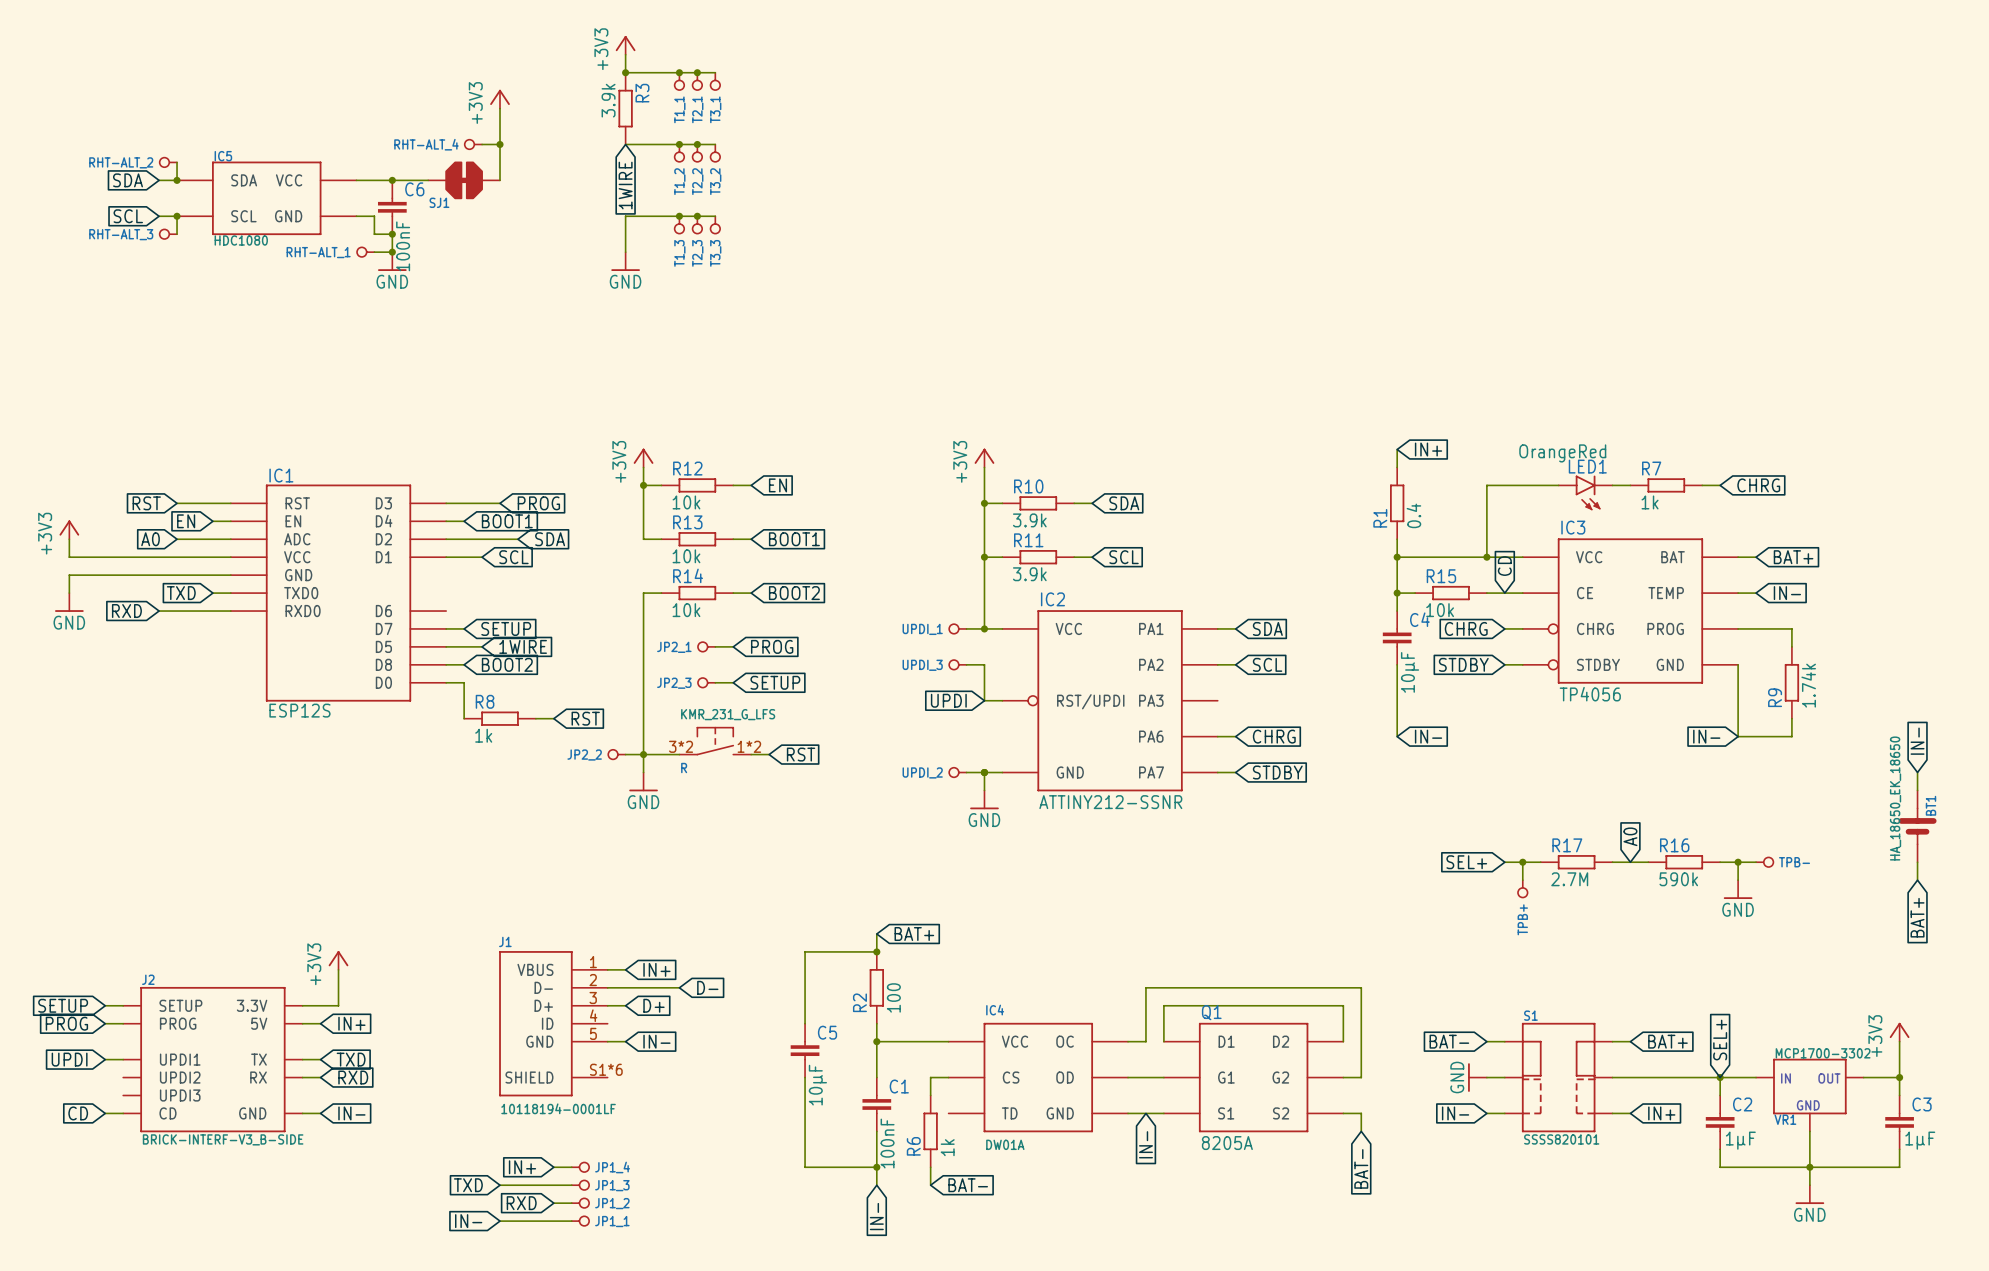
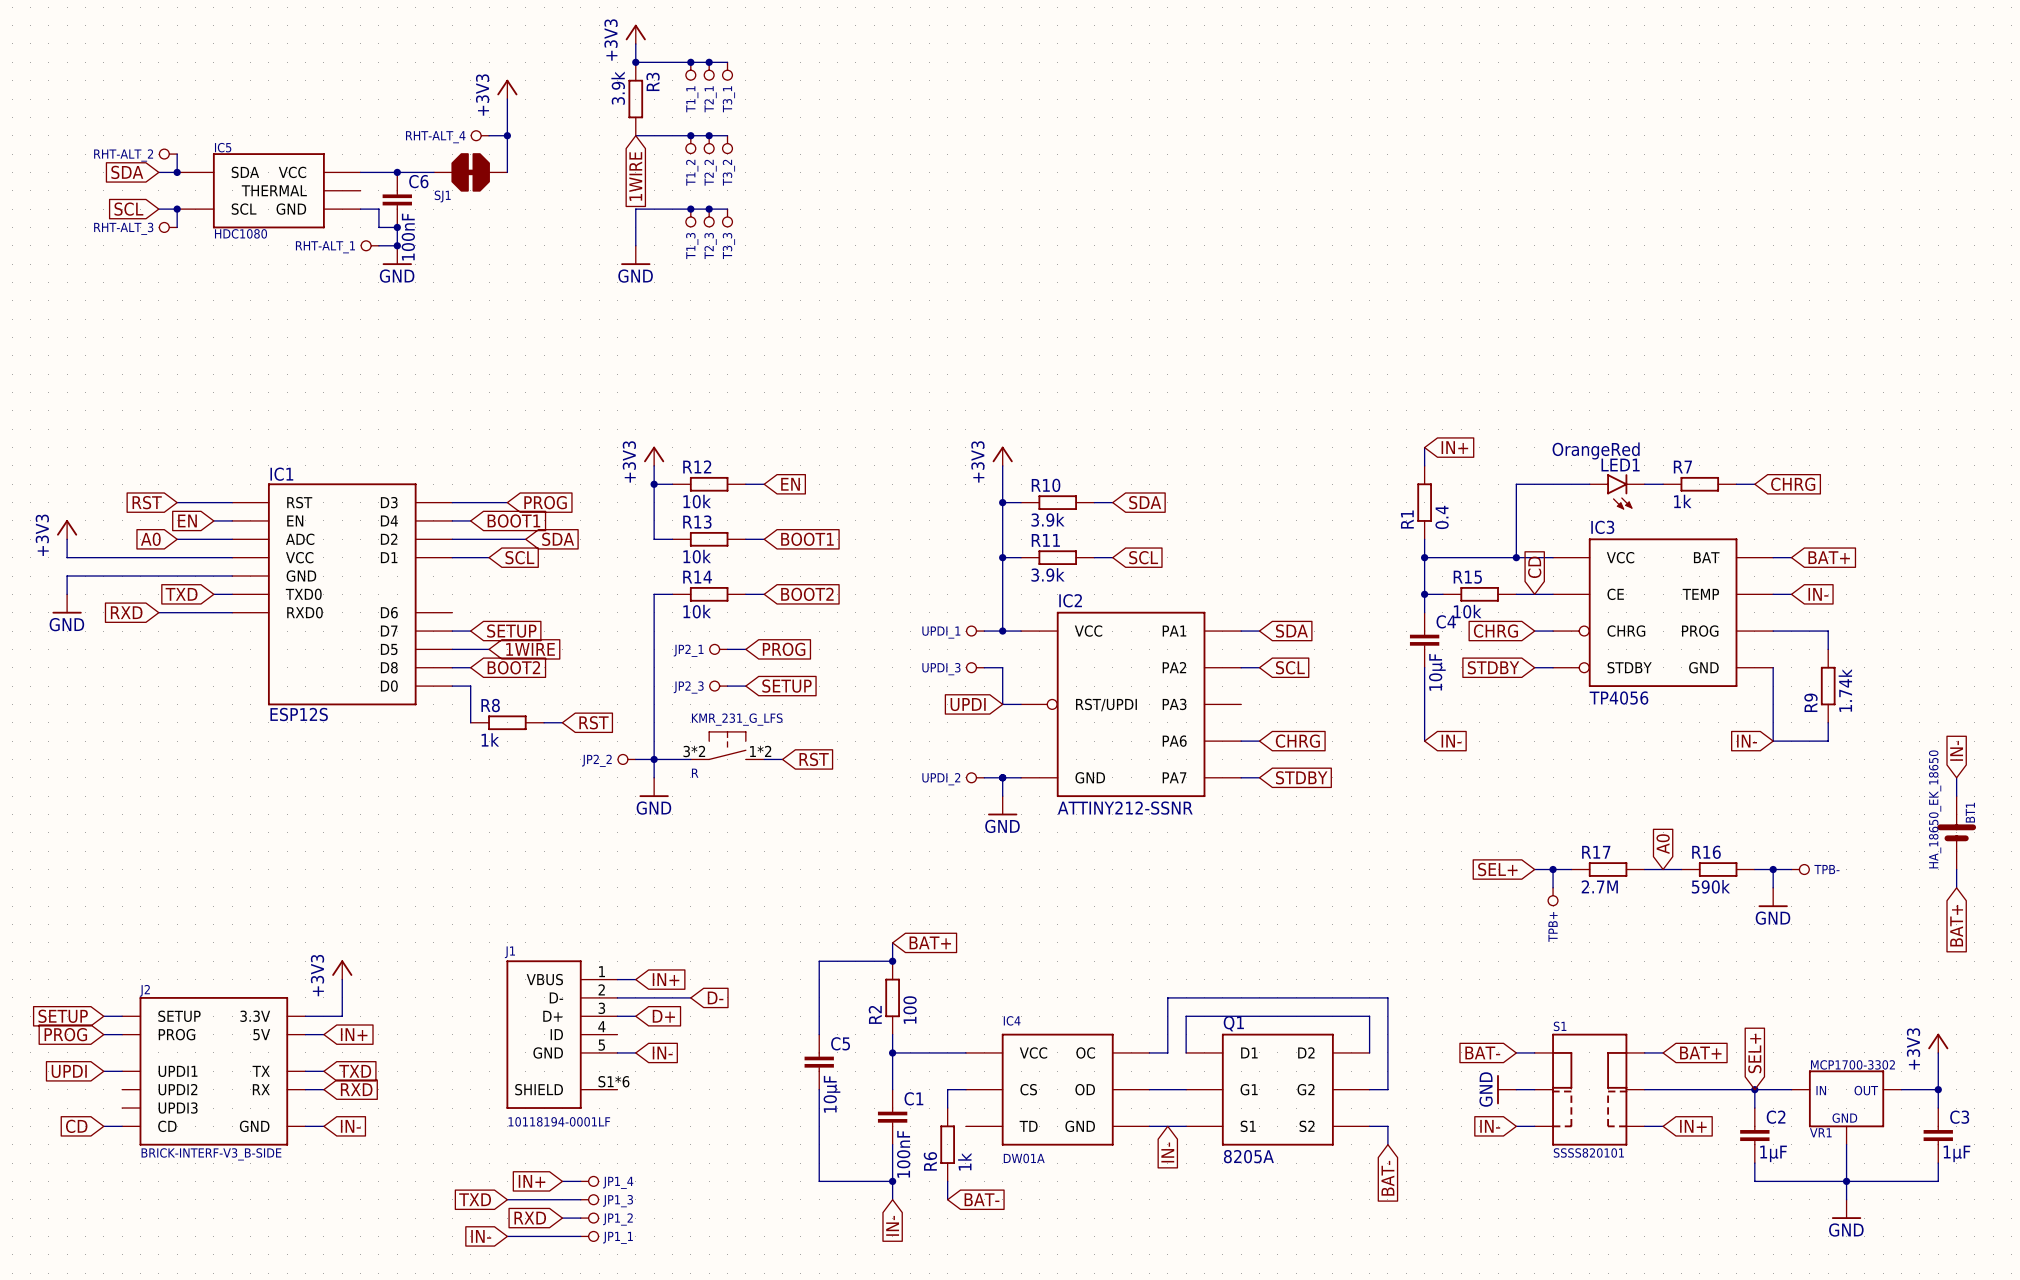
IC5 symbol: [177, 161, 357, 236] -> [177, 153, 361, 229]

